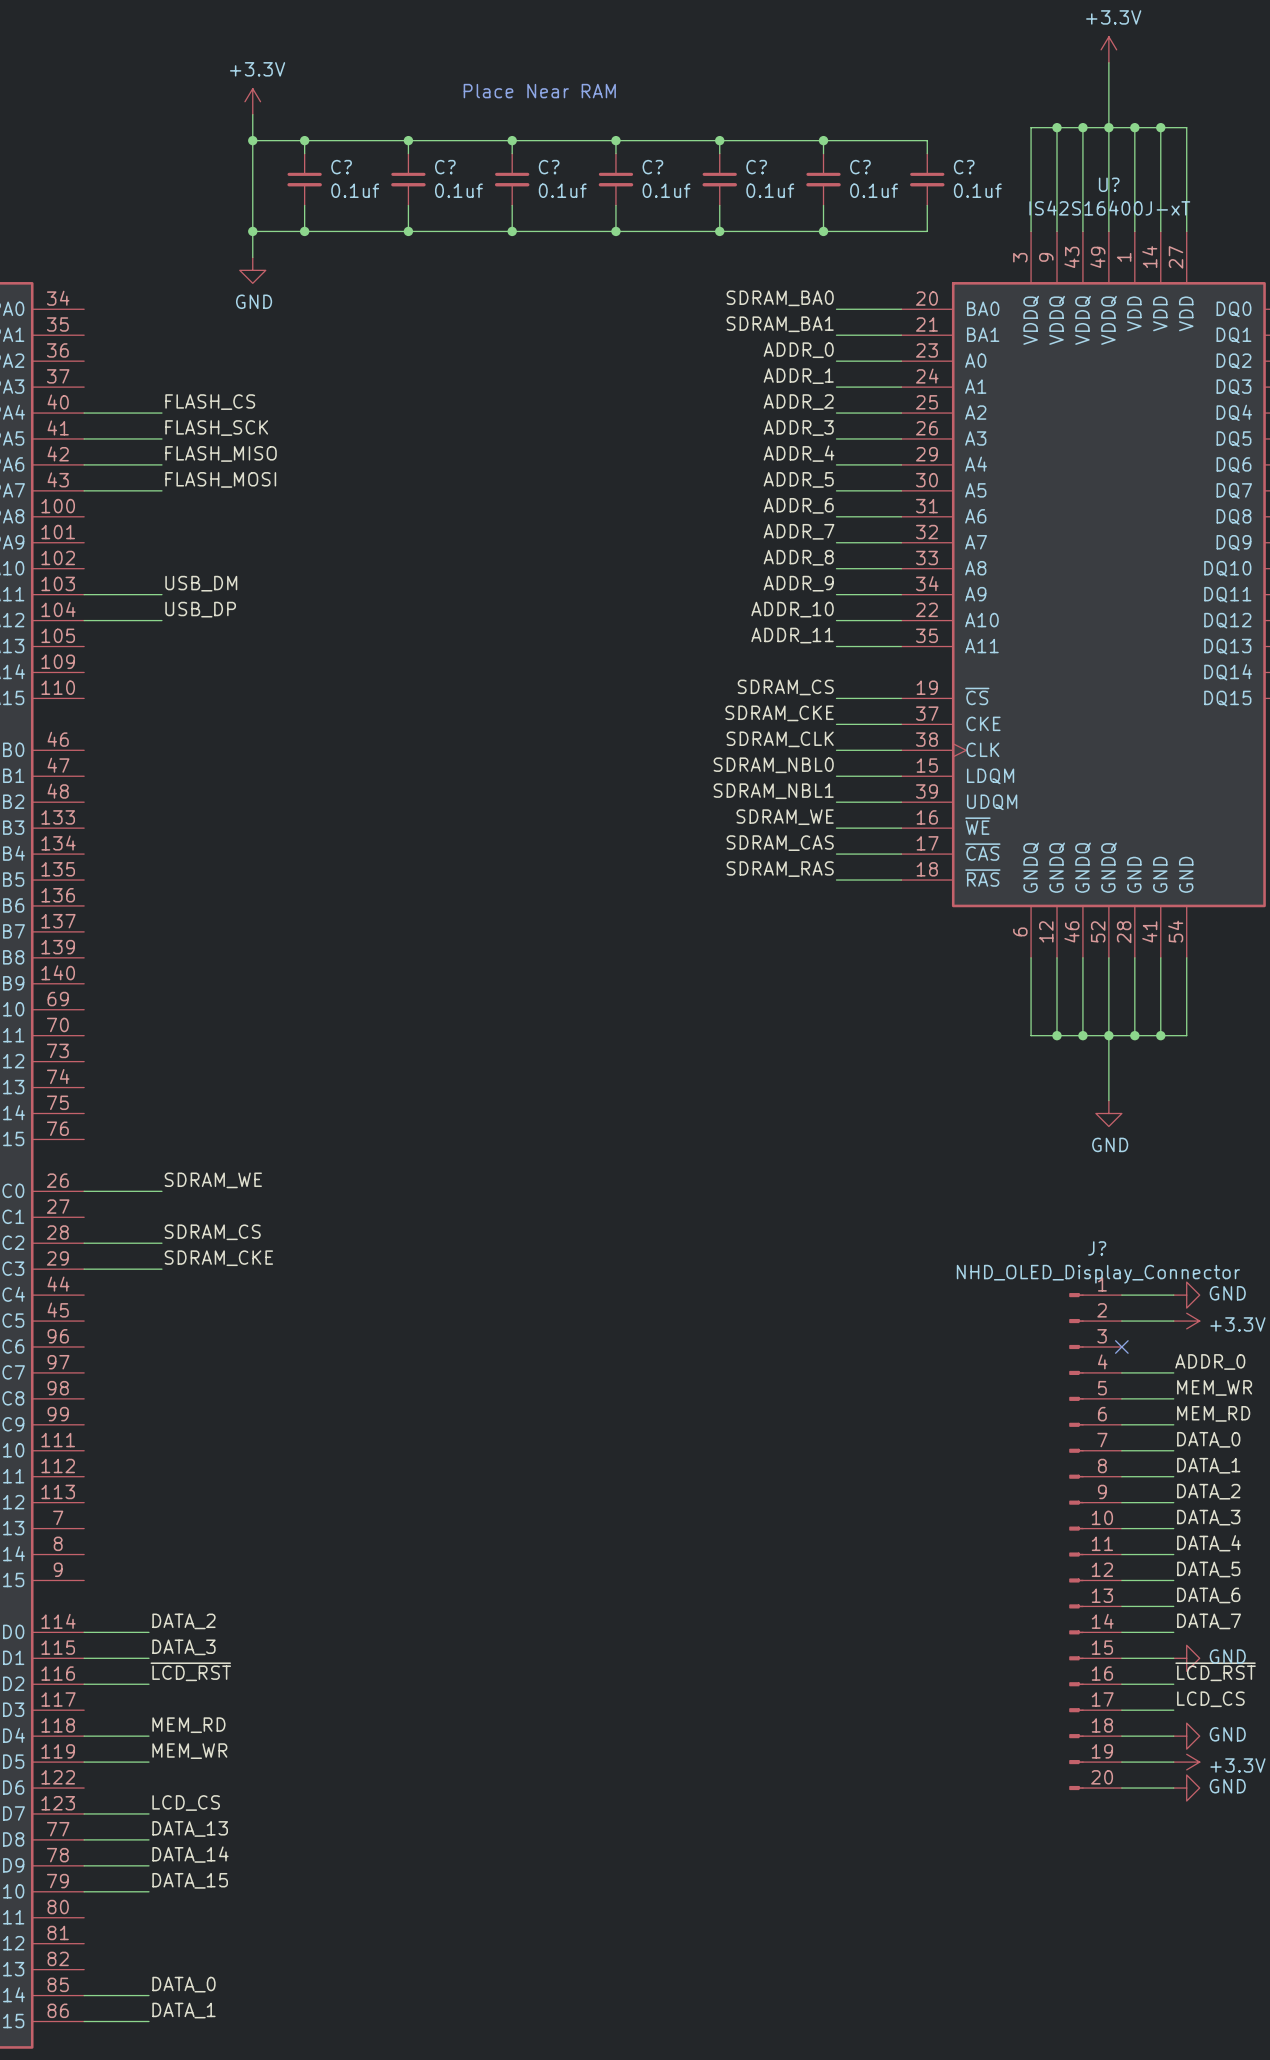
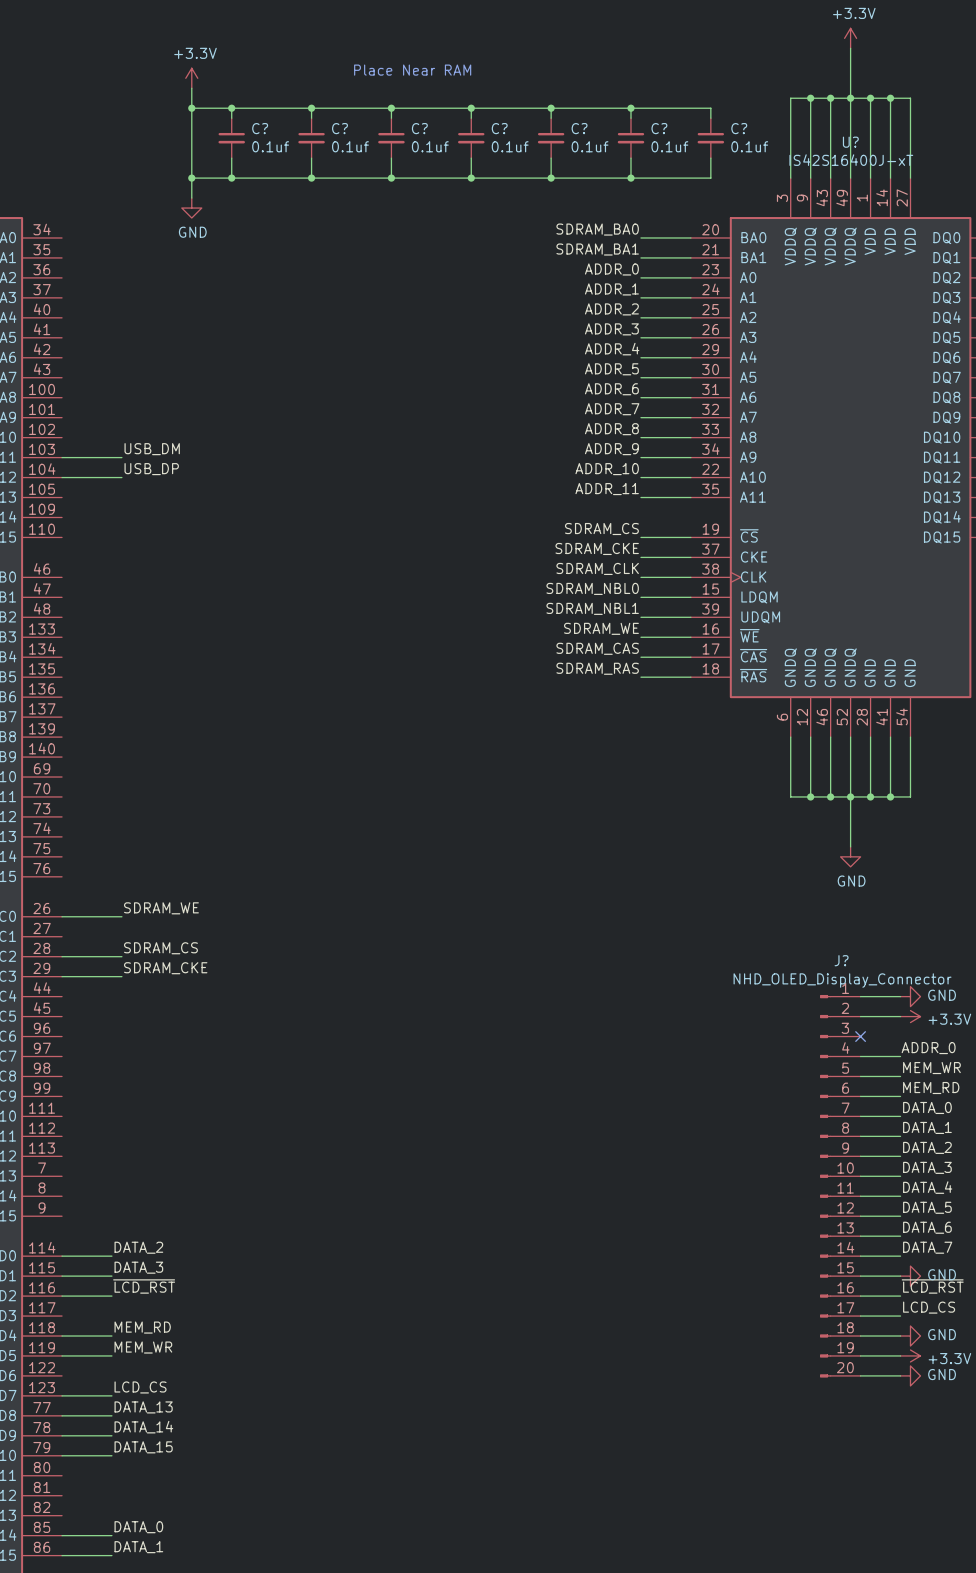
label: FLASH_CS (210, 402) -> none
wire: (84, 413) (161, 413) -> none
label: FLASH_SCK (216, 428) -> none
wire: (84, 438) (161, 438) -> none
label: FLASH_MISO (221, 453) -> none
wire: (84, 464) (161, 464) -> none
label: FLASH_MOSI (220, 479) -> none
wire: (84, 490) (161, 490) -> none

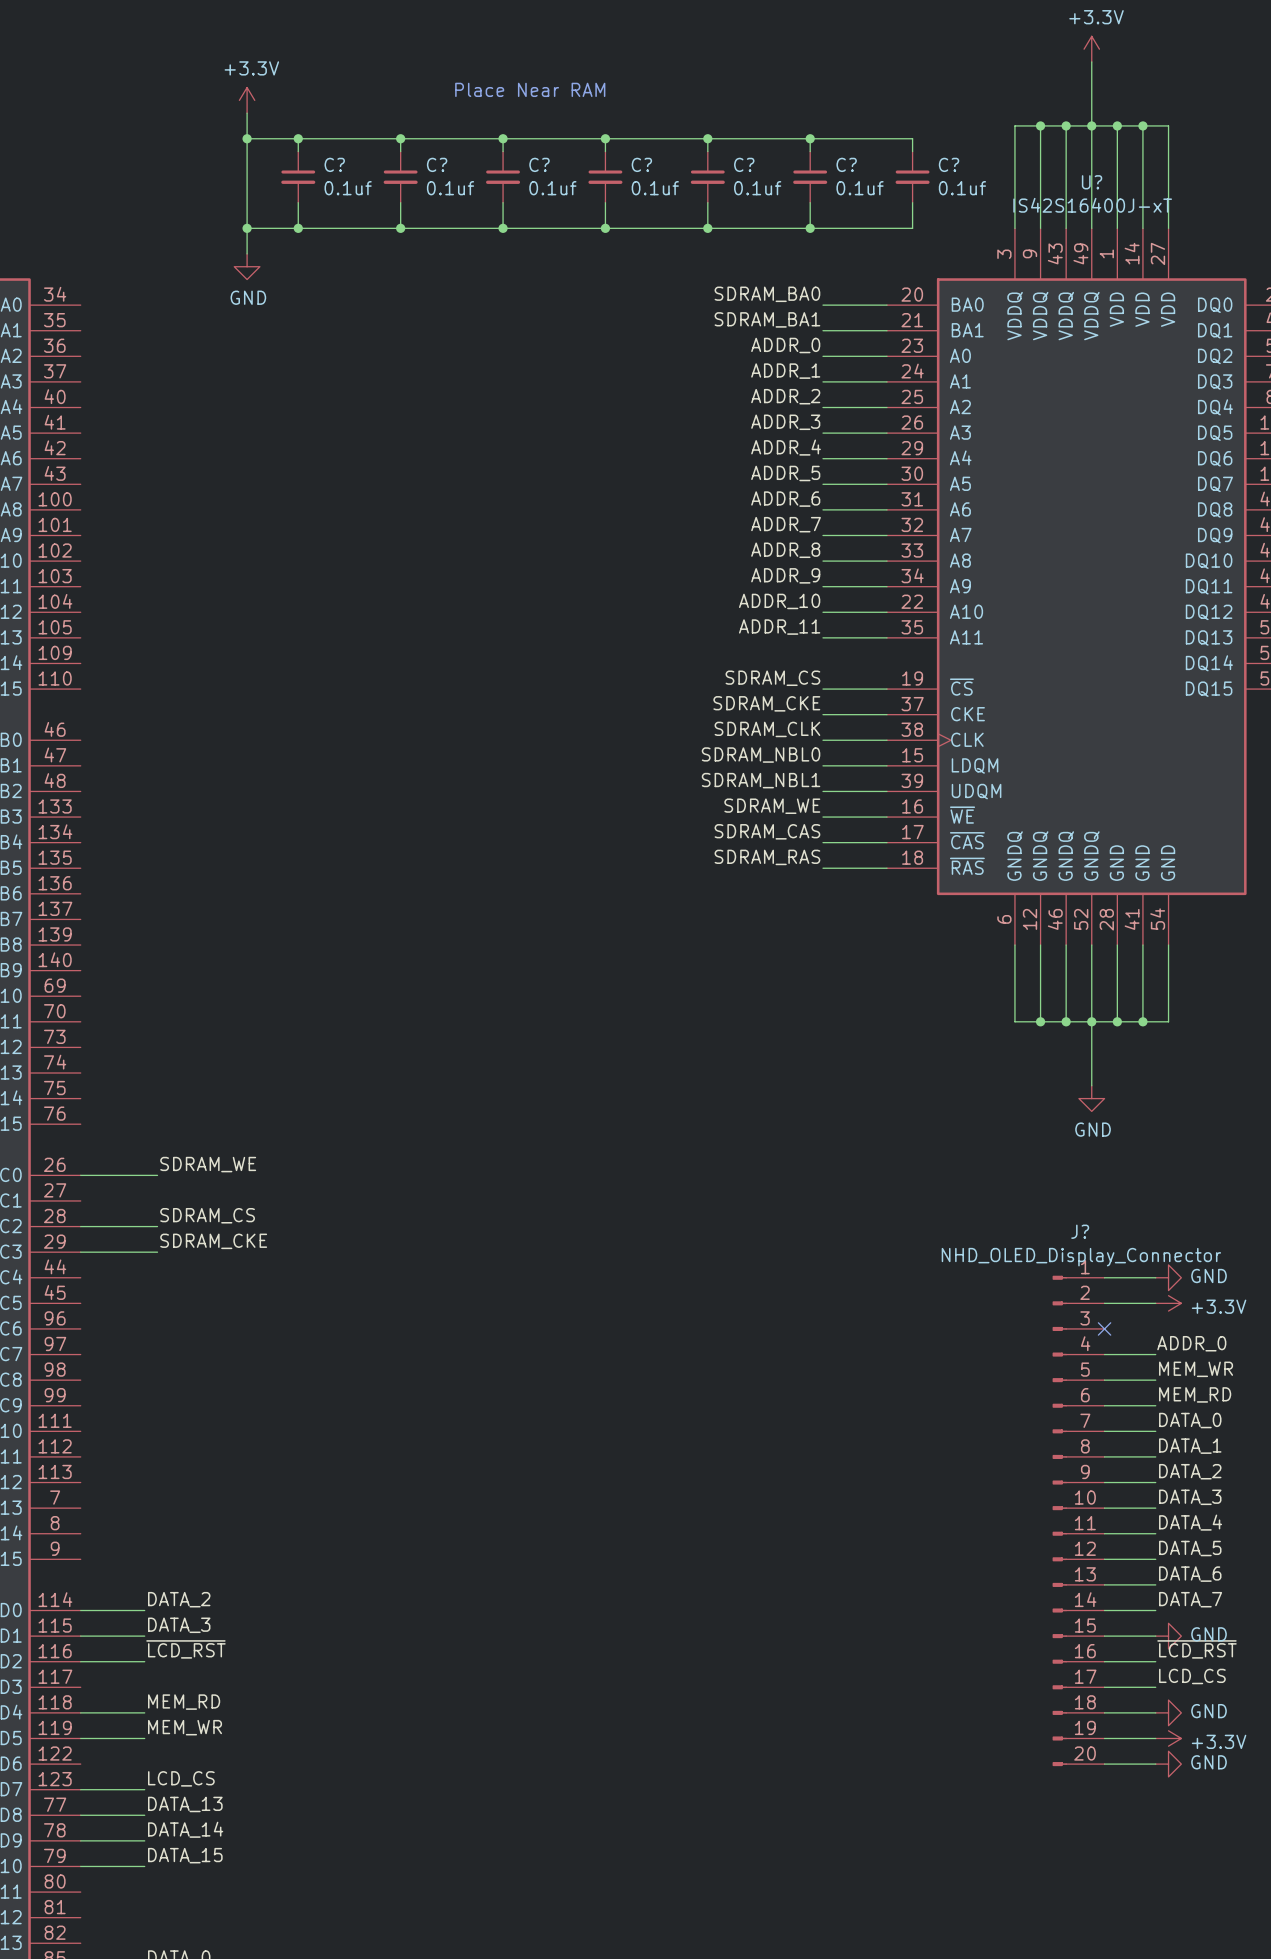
label: USB_DM (152, 449) -> none
wire: (62, 457) (121, 457) -> none
label: USB_DP (151, 469) -> none
wire: (62, 477) (121, 477) -> none

